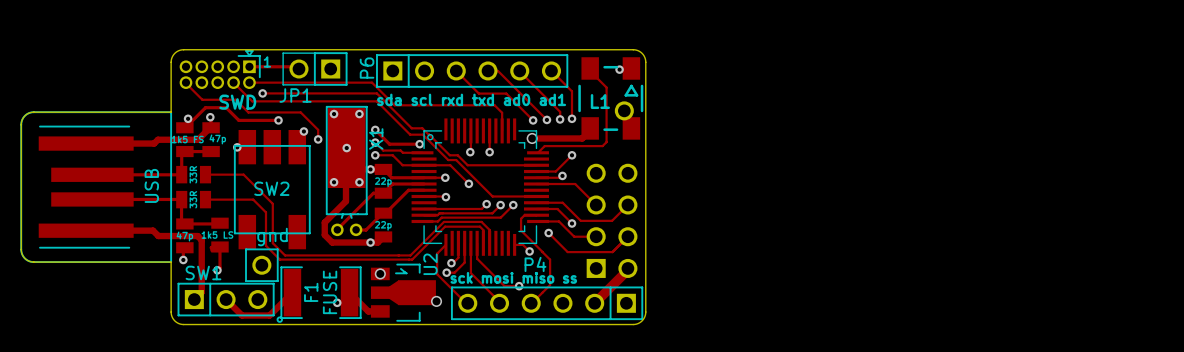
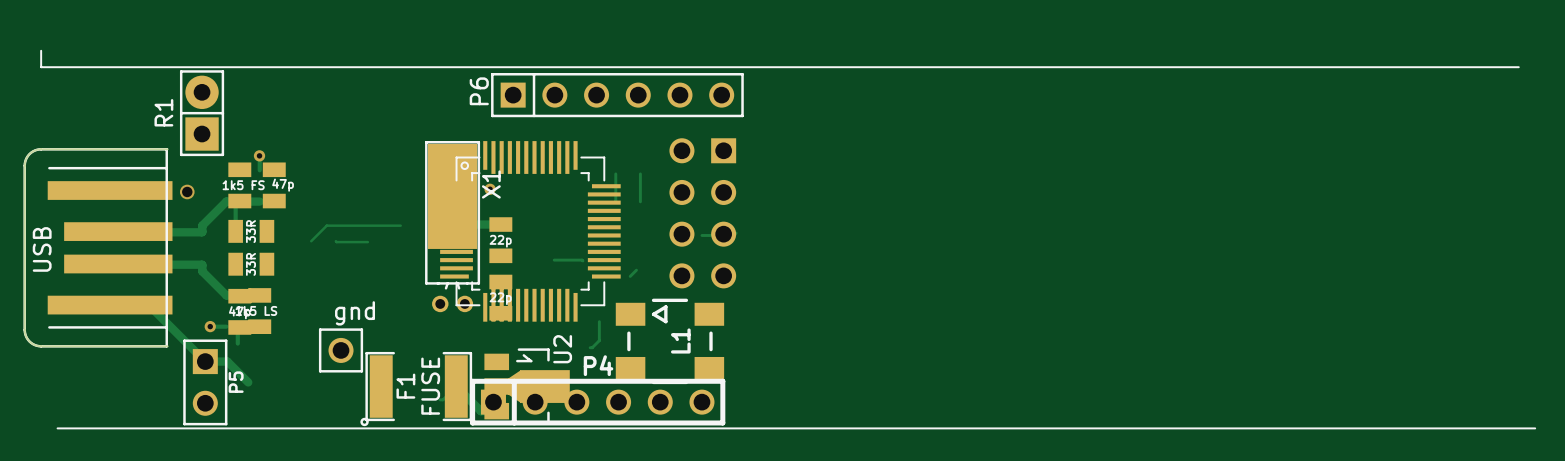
line: none -> (41, 50) (41, 67) (1518, 67)
text: 1 (267, 61) -> none
track: (249, 66) (294, 66) (298, 69) -> none
track: (590, 68) (590, 71) (606, 87) (606, 142) (602, 146) (544, 146) (538, 152) -> none
part: SWD (220, 69) -> none
JP1: (315, 69) -> none
via: (619, 69) -> none
track: (488, 70) (497, 70) (546, 119) -> none
track: (519, 70) (560, 111) (560, 119) -> none
track: (551, 70) (571, 91) (571, 118) -> none
track: (456, 71) (478, 93) (506, 93) (533, 120) -> none
track: (185, 82) (202, 99) (235, 99) (248, 112) (300, 112) (318, 129) (318, 139) -> none
track: (235, 82) (233, 82) (252, 101) (376, 101) (410, 134) (422, 134) (448, 160) (456, 160) (492, 196) (536, 196) -> none
track: (249, 82) (372, 82) (394, 105) (494, 105) (502, 112) (502, 130) -> none
R1: none -> (202, 113)
track: (262, 93) (376, 93) (411, 128) (422, 128) (449, 155) (457, 155) (467, 165) (536, 165) -> none
via: (262, 93) -> none
L1 rotation: 0° (610, 98) -> 90° counterclockwise (669, 341)
L1 position: (610, 98) -> (669, 341)
text: sda scl rxd txd ad0 ad1 (471, 99) -> none
part: (624, 110) -> none
board edge: (129, 112) (171, 112) (171, 60) (174, 53) (181, 49) (633, 49) (642, 53) (645, 60) (645, 312) (643, 319) (638, 323) (181, 324) (174, 320) (171, 313) (171, 262) (129, 262) -> none
via: (334, 114) -> none
via: (359, 114) -> none
via: none -> (259, 155)
track: none -> (259, 156) (259, 170)
track: (210, 117) (211, 118) (211, 127) (198, 139) (157, 139) (154, 143) (86, 143) -> none
via: (210, 117) -> none
via: (188, 118) -> none
via: (571, 118) -> none
via: (546, 119) -> none
via: (560, 119) -> none
track: (278, 120) (238, 120) (226, 107) (205, 107) (183, 127) -> none
via: (278, 120) -> none
via: (533, 120) -> none
track: (375, 129) (389, 144) (419, 144) -> none
via: (375, 129) -> none
track: (591, 130) (590, 128) (591, 129) (582, 138) (532, 138) -> none
via: (303, 131) -> none
via: (532, 138) -> none
via: (318, 139) -> none
track: (375, 142) (383, 150) (422, 152) -> none
via: none -> (187, 191)
via: (419, 144) -> none
via: (237, 147) -> none
via: (346, 148) -> none
track: none -> (259, 201) (226, 201) (202, 225) (201, 232) (128, 232)
via: (470, 152) -> none
via: (489, 152) -> none
track: (375, 155) (392, 155) (402, 165) (450, 165) (468, 183) -> none
via: (375, 155) -> none
track: (571, 155) (555, 171) (536, 171) -> none
via: (571, 155) -> none
via: (370, 169) -> none
track: (386, 169) (383, 169) (391, 177) (445, 177) -> none
track: none -> (400, 225) (326, 225) (311, 241)
track: (92, 174) (181, 174) -> none
track: (205, 174) (243, 174) (272, 203) (272, 243) (285, 255) (410, 255) (444, 221) (481, 221) (489, 229) (489, 243) -> none
via: (562, 175) -> none
via: (445, 177) -> none
track: none -> (336, 242) (367, 242)
via: (334, 182) -> none
via: (359, 182) -> none
via: (468, 183) -> none
track: (424, 184) (392, 184) (383, 193) -> none
track: (536, 184) (575, 184) (596, 204) -> none
part: none -> USB (97, 247)
part: USB (96, 187) -> none
part position: (480, 187) -> (530, 231)
SW2: (272, 189) -> none
track: (424, 190) (408, 190) (365, 230) (355, 230) -> none
track: (383, 193) (373, 193) (336, 230) -> none
track: (346, 195) (346, 160) (346, 201) (324, 222) (324, 235) (332, 242) (377, 242) (383, 236) -> none
via: (445, 197) -> none
track: (92, 199) (181, 199) (181, 220) (184, 223) (219, 223) -> none
track: none -> (128, 264) (201, 264) (202, 271) (226, 295) (259, 295)
track: (205, 199) (253, 199) (265, 212) (265, 245) (279, 259) (412, 259) (445, 226) (479, 226) (483, 230) (483, 243) -> none
track: (536, 202) (562, 202) (580, 220) (612, 220) (627, 204) -> none
via: (486, 204) -> none
track: (500, 205) (492, 213) (424, 215) -> none
via: (500, 205) -> none
track: (513, 205) (500, 217) (441, 217) (437, 221) (422, 221) -> none
via: (513, 205) -> none
track: (424, 208) (481, 208) -> none
track: (536, 208) (557, 208) (571, 223) -> none
track: (536, 215) (524, 215) (521, 218) (521, 230) (542, 251) -> none
part rotation: 0° (612, 220) -> 180° (702, 213)
part position: (612, 220) -> (702, 213)
track: (538, 221) (559, 221) (574, 236) (596, 236) -> none
via: (571, 223) -> none
track: (86, 230) (153, 230) (158, 236) (197, 236) (201, 240) (201, 292) (194, 299) -> none
track: none -> (149, 305) (205, 361) (227, 361) (248, 382)
track: (548, 233) (567, 252) (612, 252) (627, 236) -> none
via: (548, 233) -> none
part position: (219, 235) -> (259, 311)
via: (370, 242) -> none
track: (464, 243) (464, 262) (454, 272) (446, 272) -> none
track: (470, 243) (470, 273) (499, 303) -> none
track: (477, 243) (477, 258) (504, 286) (519, 286) -> none
track: (445, 244) (437, 253) (437, 274) (467, 304) -> none
track: (514, 244) (523, 244) (529, 251) -> none
track: (219, 246) (219, 267) (217, 270) -> none
track: none -> (210, 326) (226, 326)
track: (211, 247) (211, 250) -> none
via: (529, 251) -> none
track: (542, 252) (550, 259) (550, 285) (530, 304) -> none
via position: (183, 259) -> (210, 326)
via: (451, 263) -> none
track: (627, 268) (594, 303) -> none
via: (217, 270) -> none
via: (446, 272) -> none
via: (380, 273) -> none
text: sck mosi miso ss (513, 277) -> none
P4 footprint: [450, 286, 644, 321] -> [470, 378, 726, 426]
via: (519, 286) -> none
P5: none -> (205, 382)
track: (292, 292) (269, 315) (242, 315) (226, 299) -> none
SW1: (226, 299) -> none
via: (436, 301) -> none
via: (337, 302) -> none
line: none -> (57, 428) (1535, 428)

